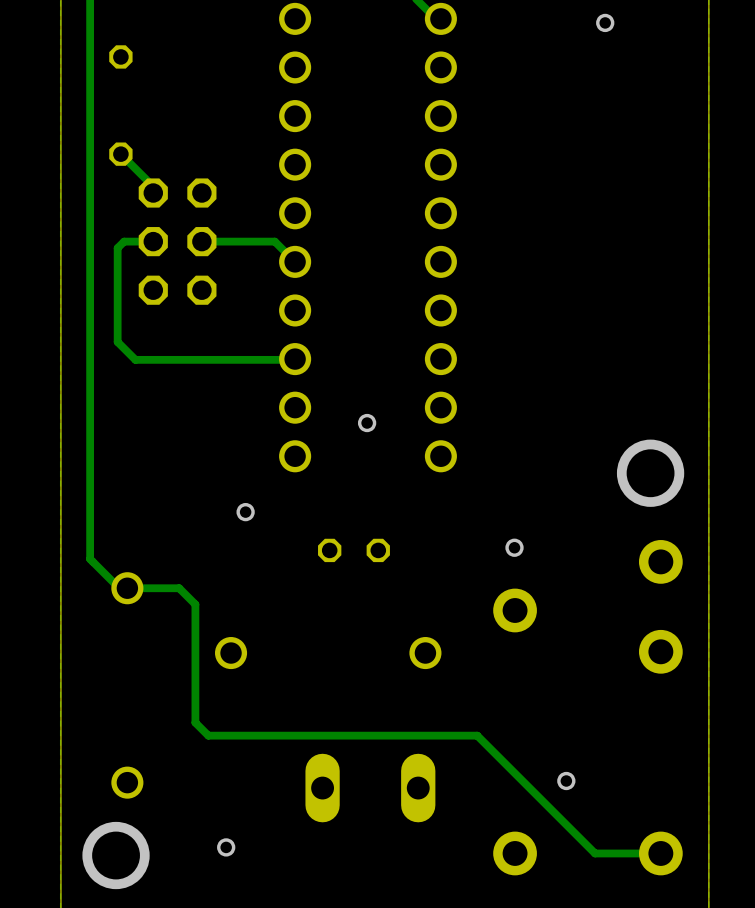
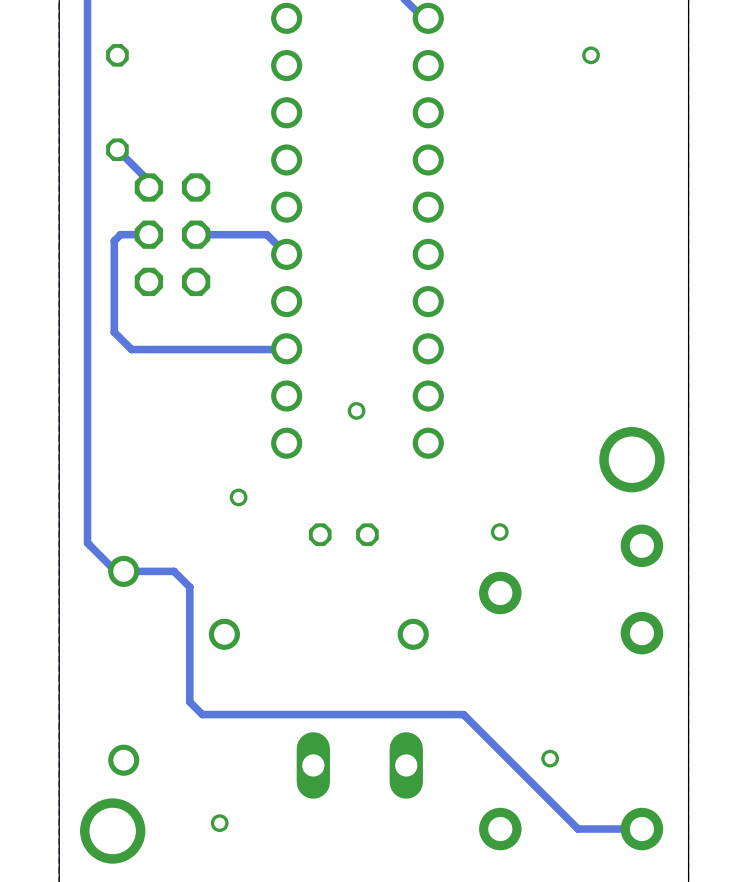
via position: (605, 22) -> (591, 55)

